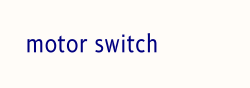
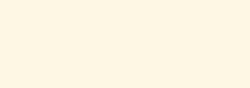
text: motor switch (91, 42) -> none

